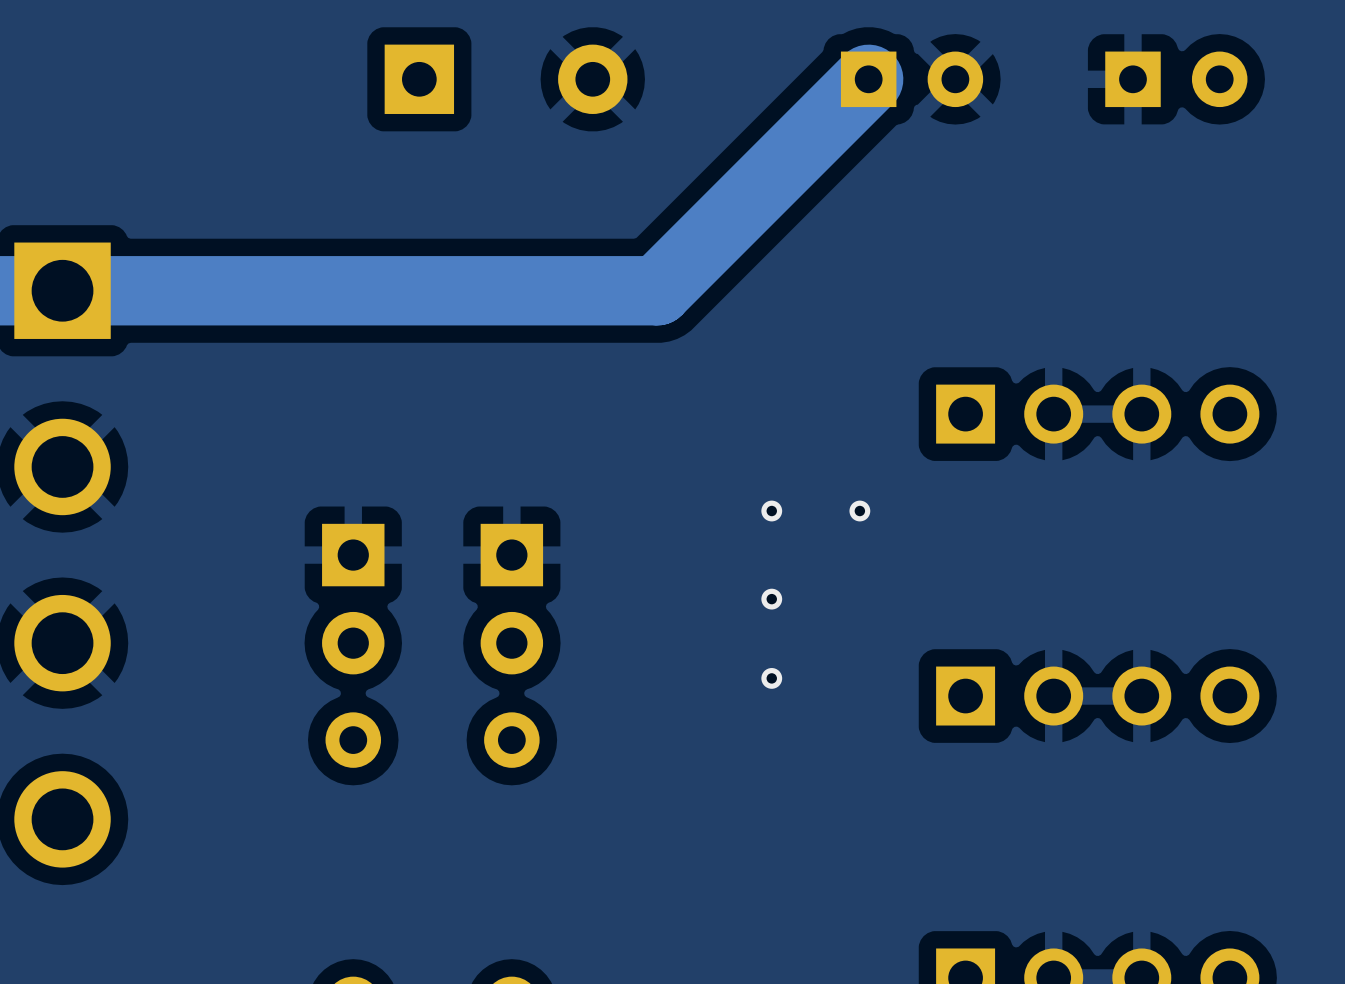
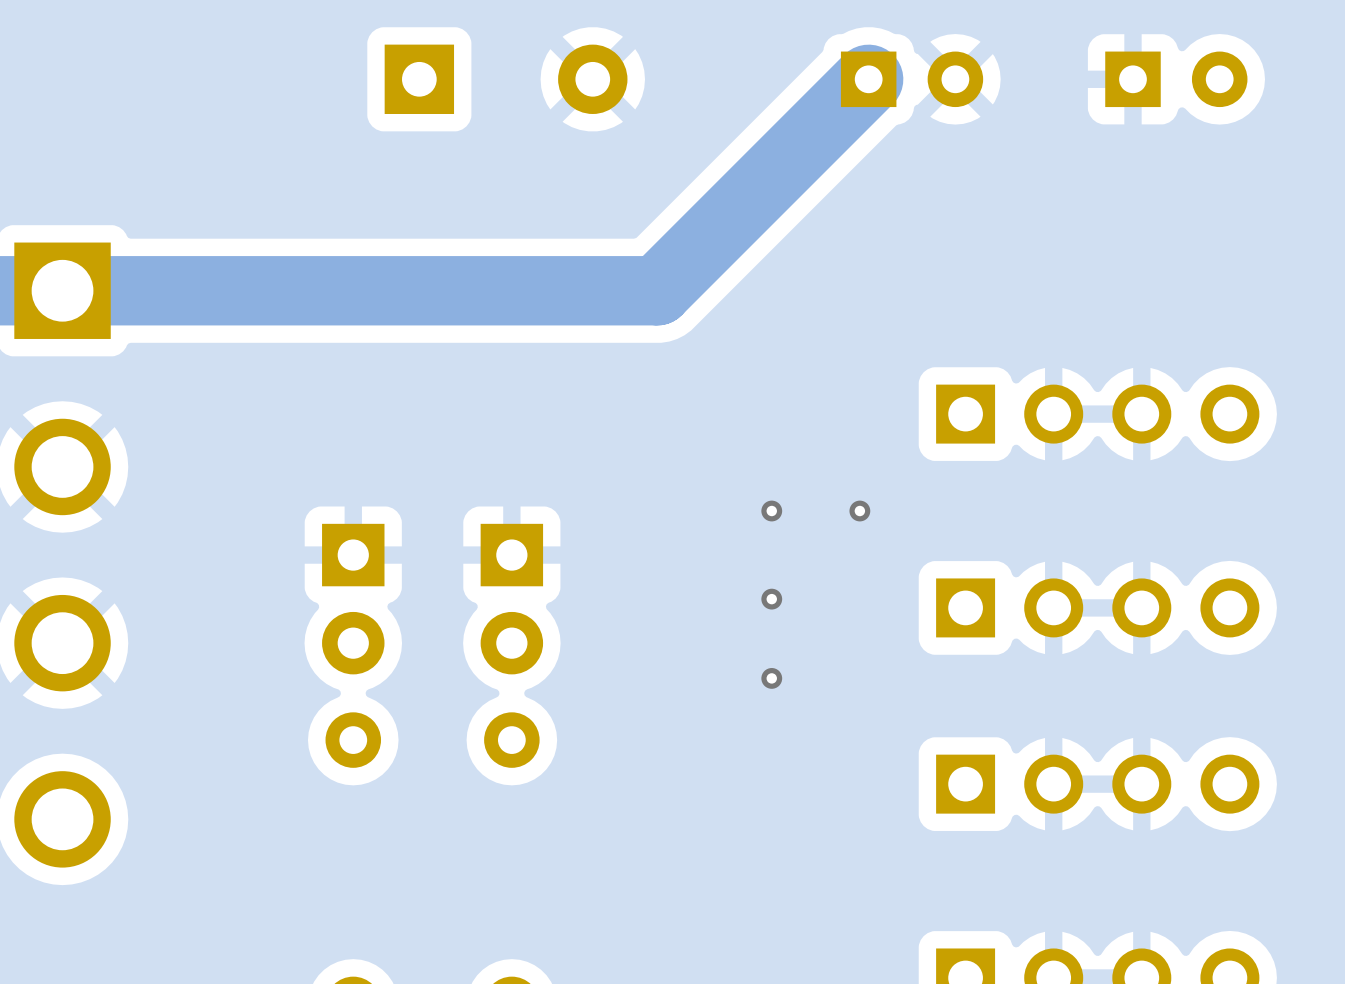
part: none -> (1097, 607)
part: (1097, 696) -> none
part: none -> (1097, 784)

